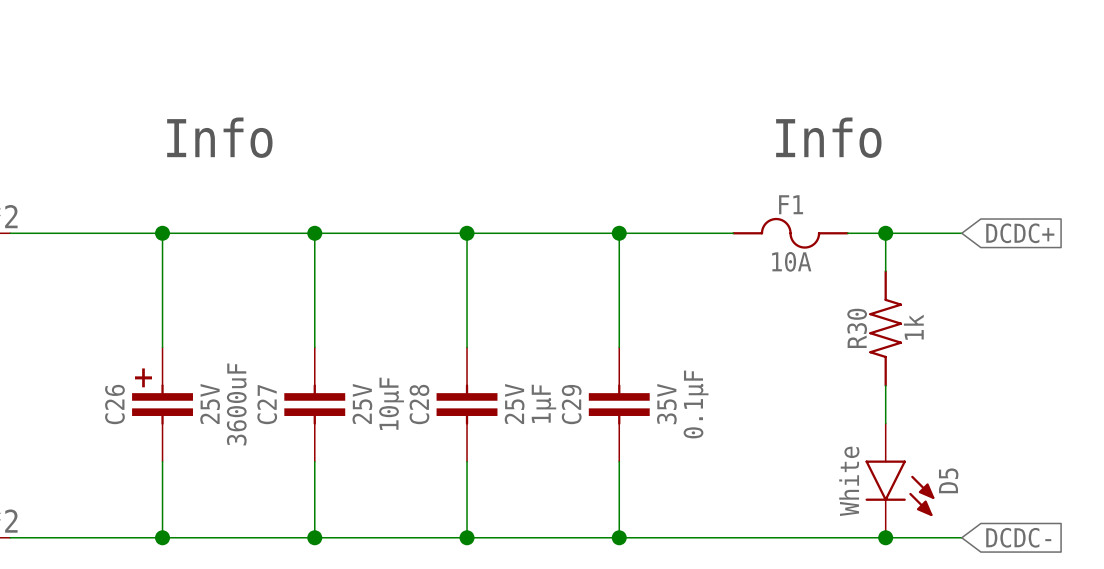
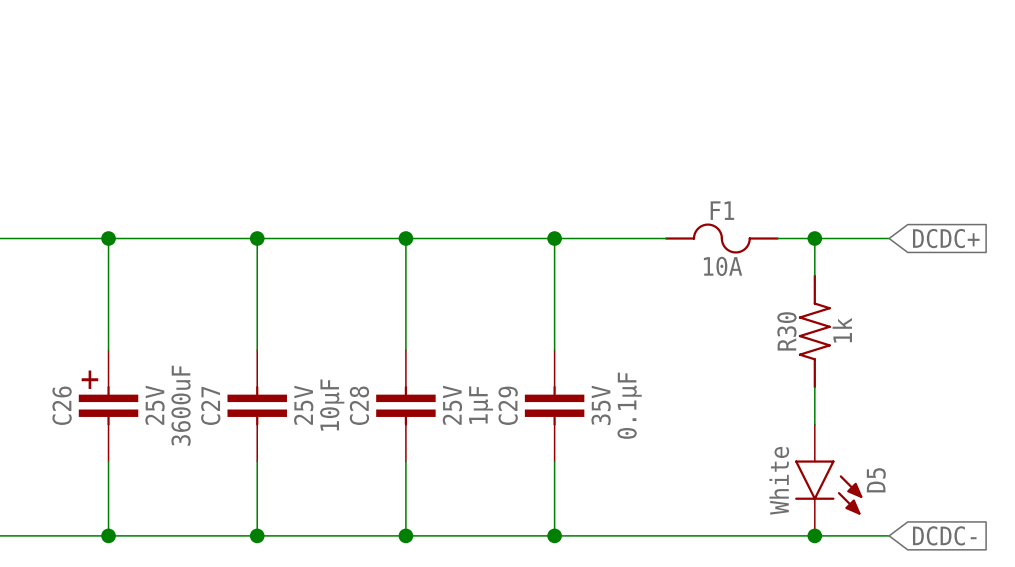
text: Info (219, 137) -> none
text: Info (828, 137) -> none

